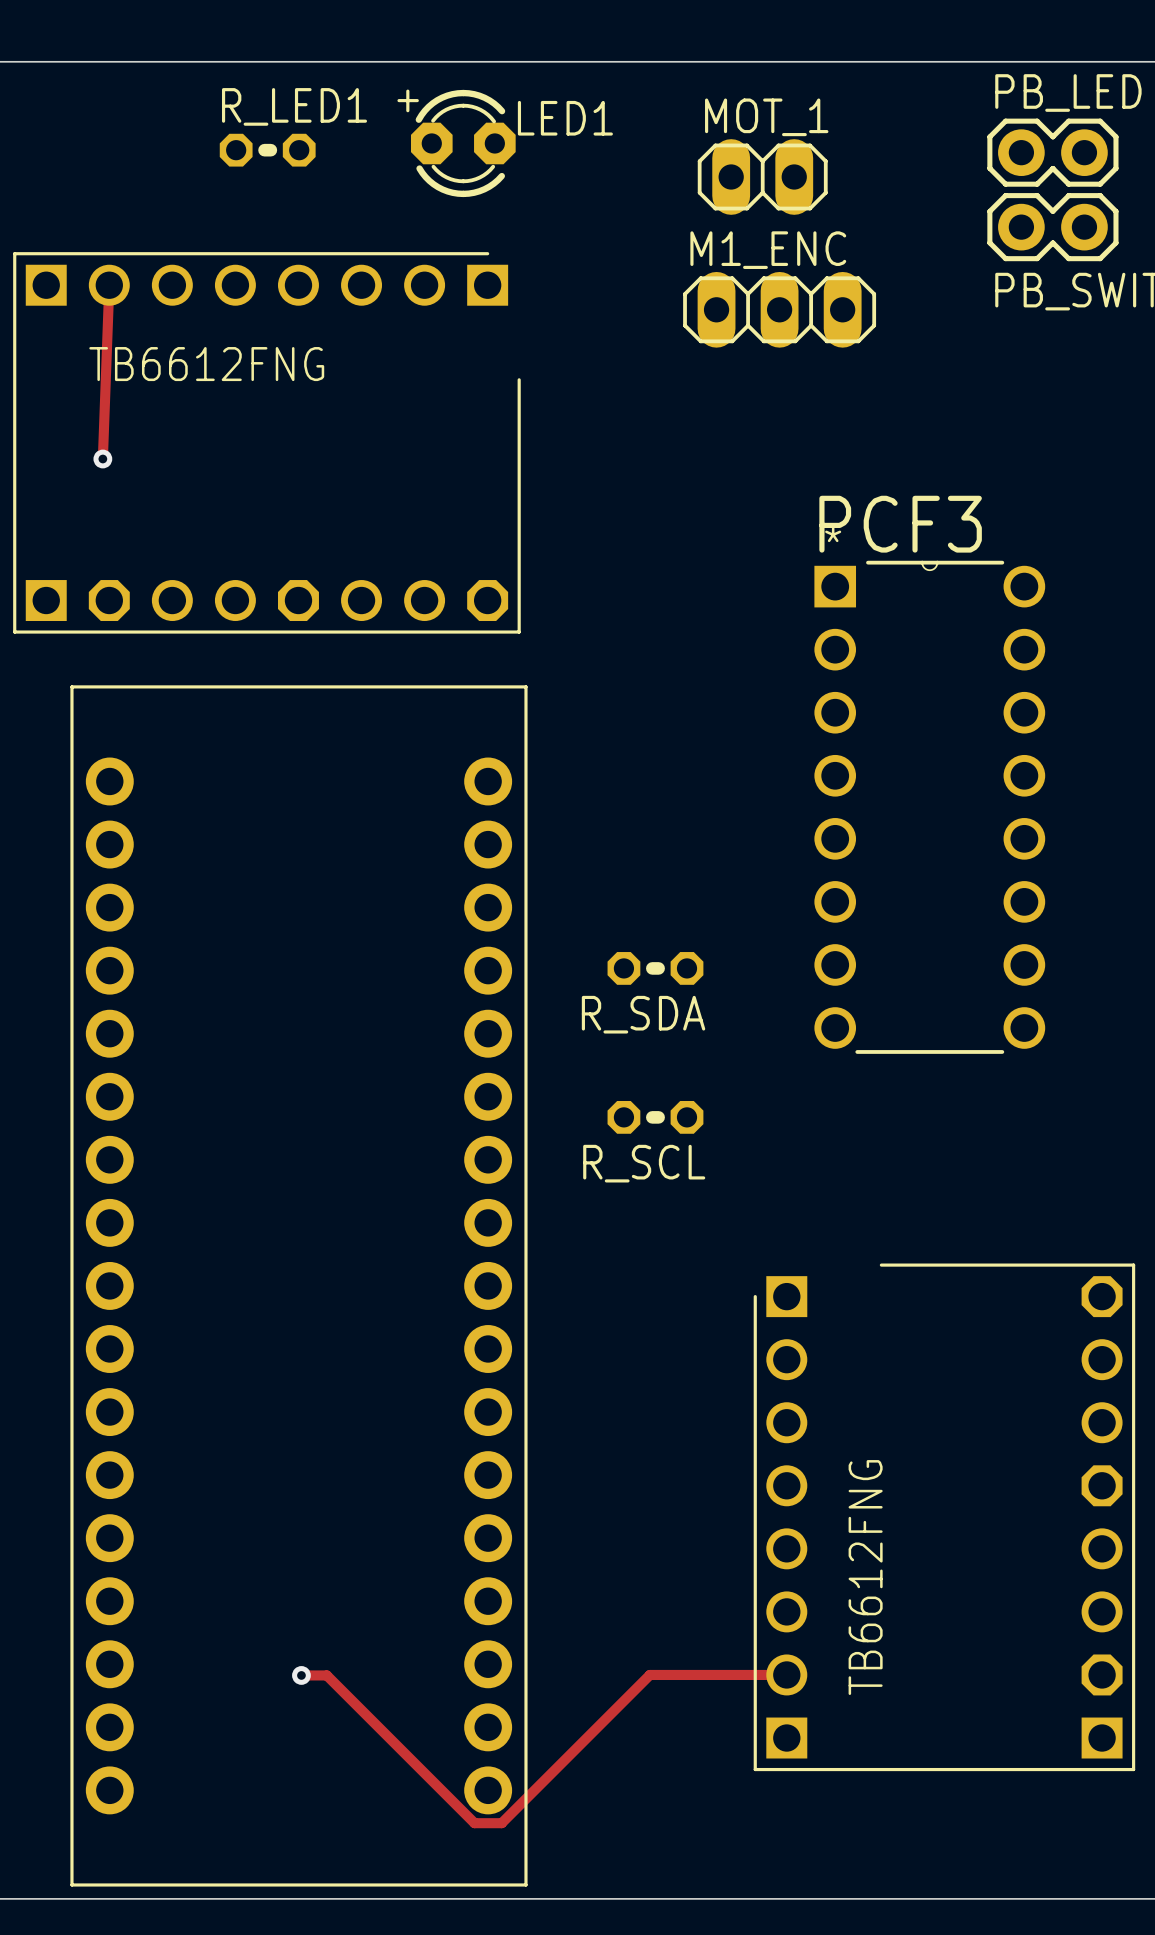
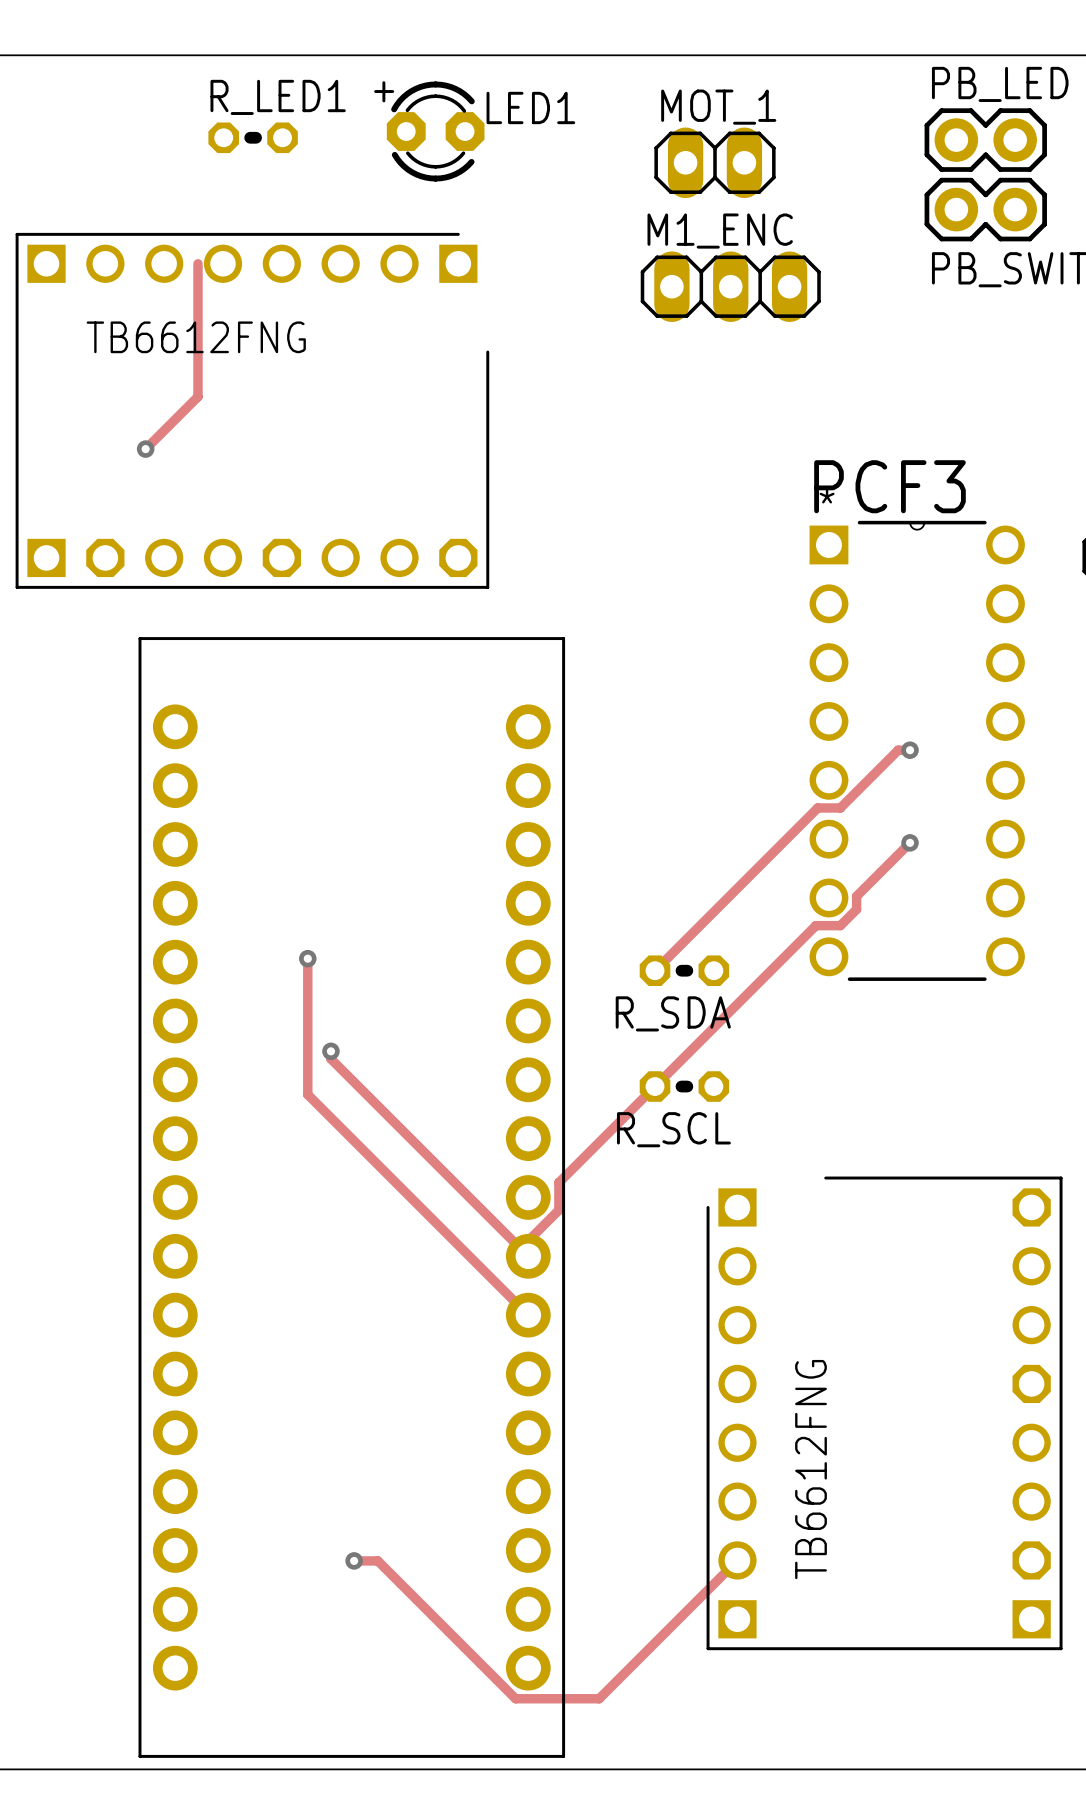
track: (109, 285) (102, 459) -> none
track: none -> (198, 263) (198, 396) (145, 449)
via position: (102, 459) -> (145, 449)
track: none -> (910, 750) (898, 750) (840, 807) (817, 807) (655, 970)
via: none -> (910, 750)
PCF3 position: (929, 807) -> (917, 750)
track: none -> (910, 842) (856, 896) (856, 909) (840, 925) (815, 925) (558, 1182) (558, 1210) (528, 1240) (528, 1256) (330, 1058) (330, 1051)
via: none -> (910, 842)
R_SDA position: (655, 968) -> (684, 970)
track: none -> (307, 958) (307, 1094) (528, 1315)
via: none -> (307, 958)
R_SCL position: (655, 1117) -> (684, 1086)
via: none -> (330, 1051)
part position: (298, 1285) -> (351, 1197)
track: (786, 1674) (649, 1674) (501, 1823) (474, 1823) (326, 1675) (301, 1675) -> (737, 1560) (599, 1698) (515, 1698) (377, 1560) (354, 1560)
via position: (301, 1675) -> (354, 1560)

